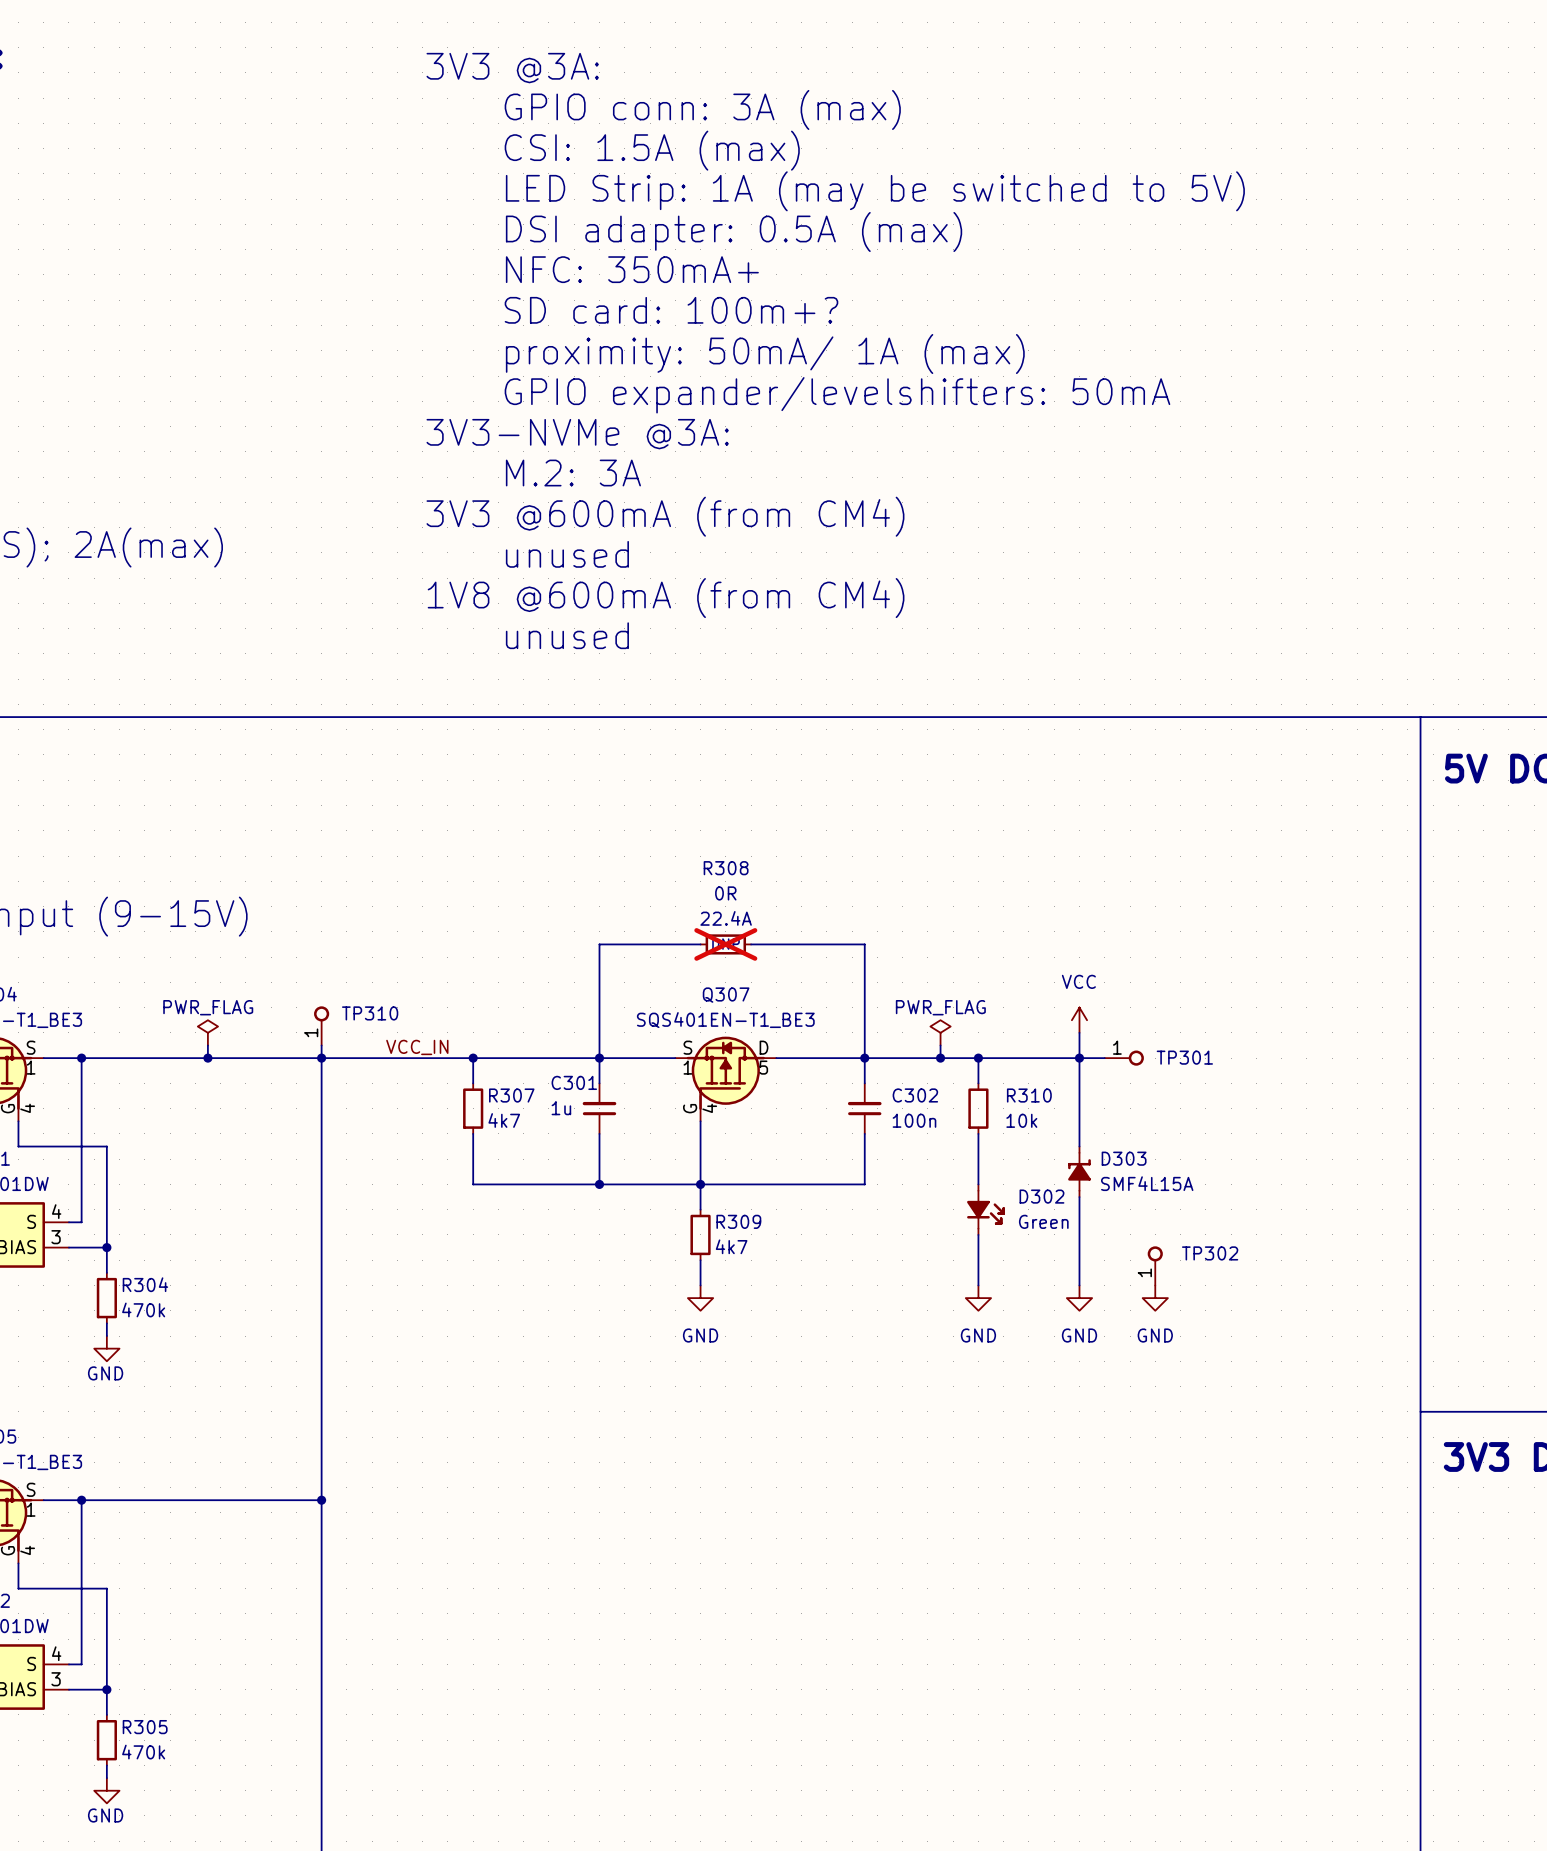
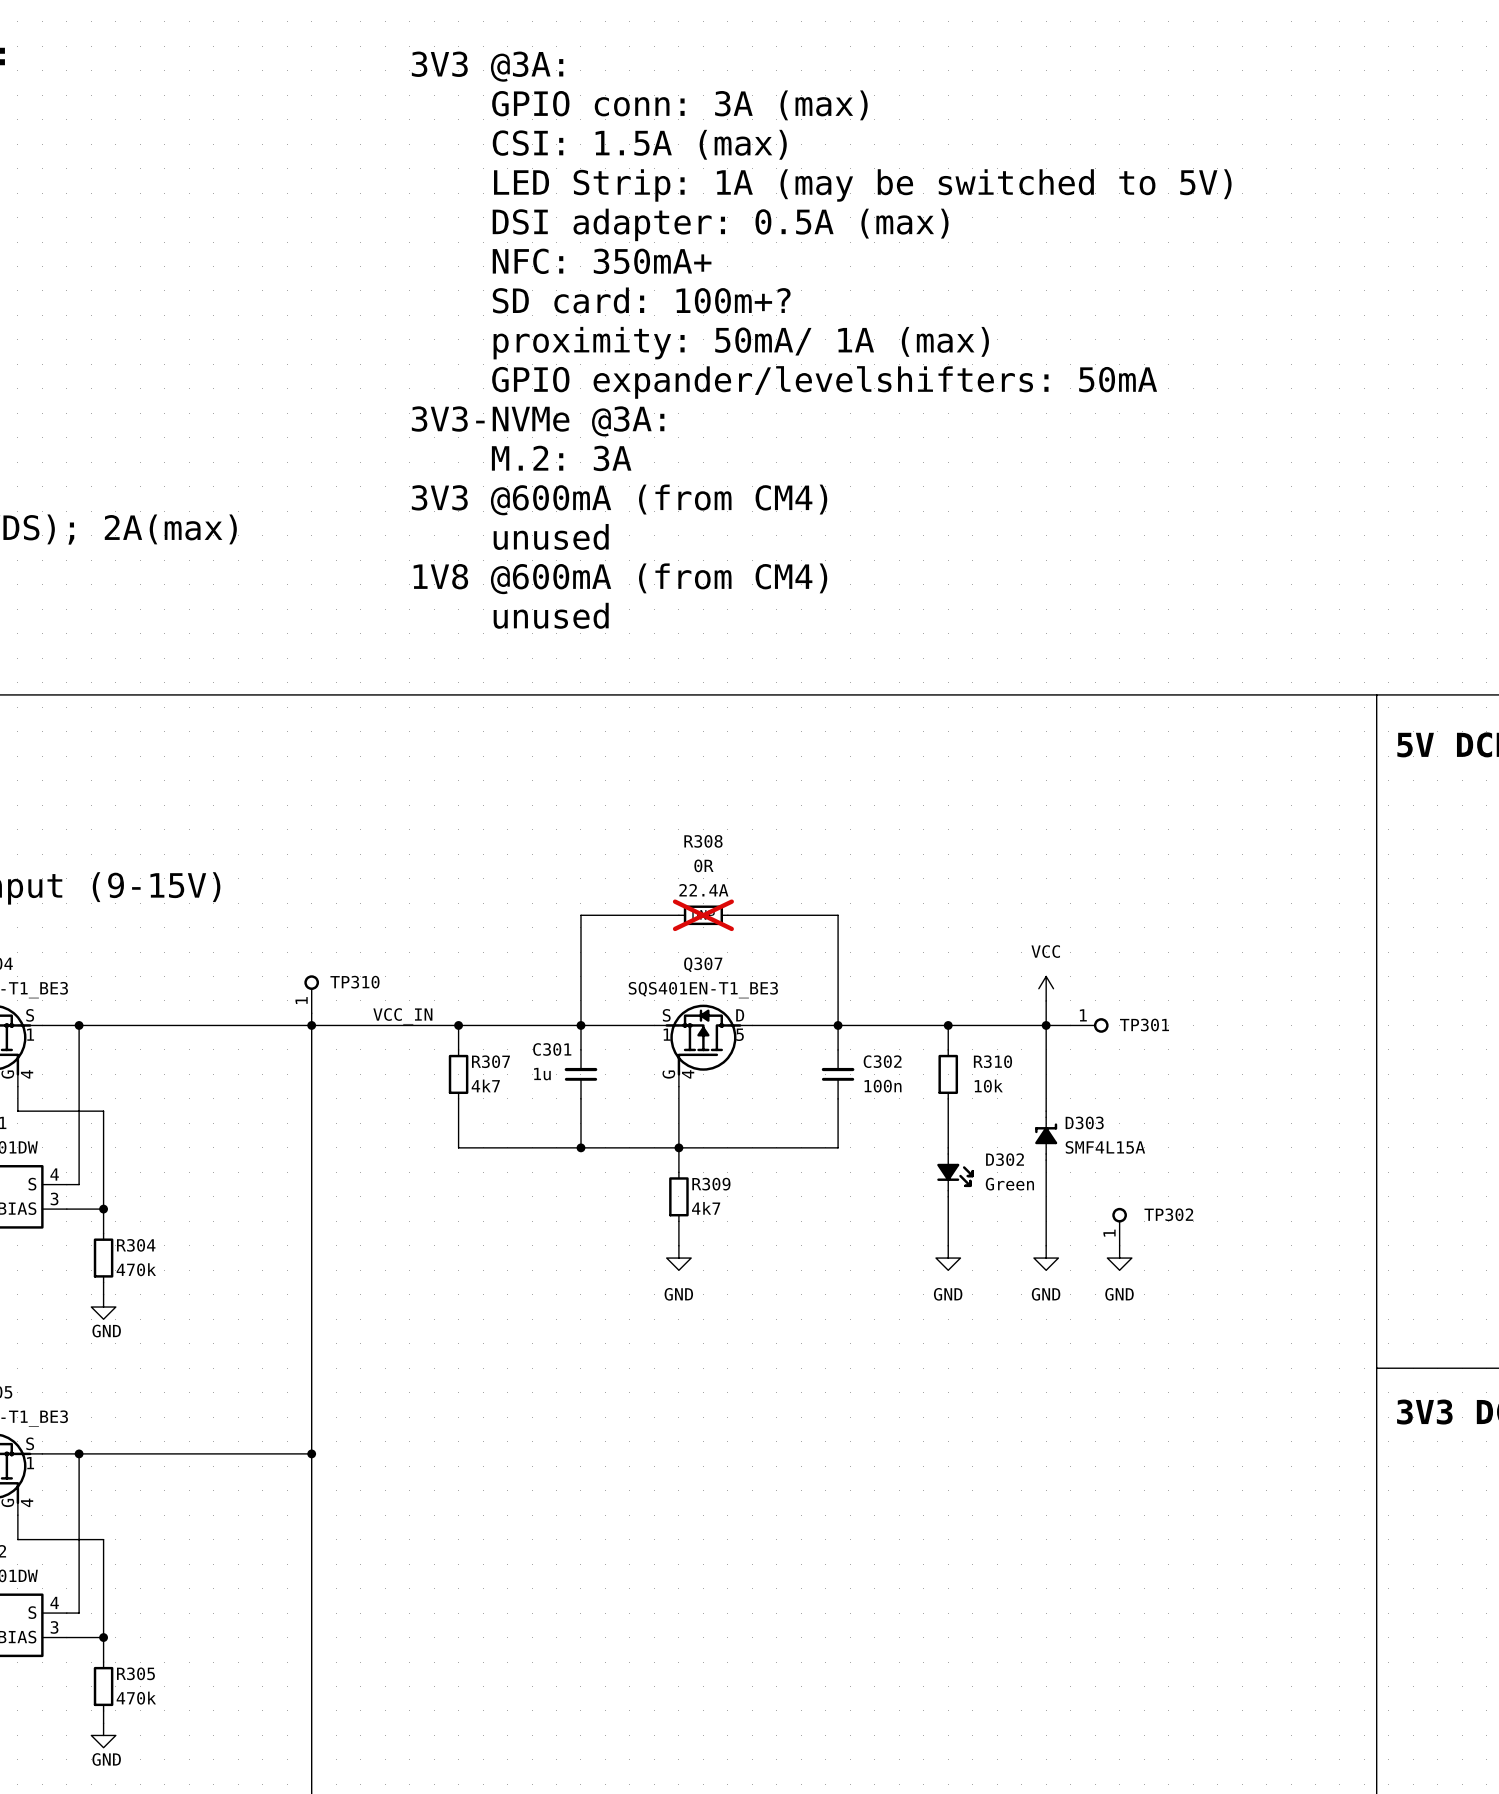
power symbol: PWR_FLAG (207, 1032) -> none
power symbol: PWR_FLAG (940, 1032) -> none
wire: (207, 1045) (207, 1058) -> none
wire: (940, 1045) (940, 1058) -> none
junction: (207, 1058) -> none
junction: (940, 1058) -> none

